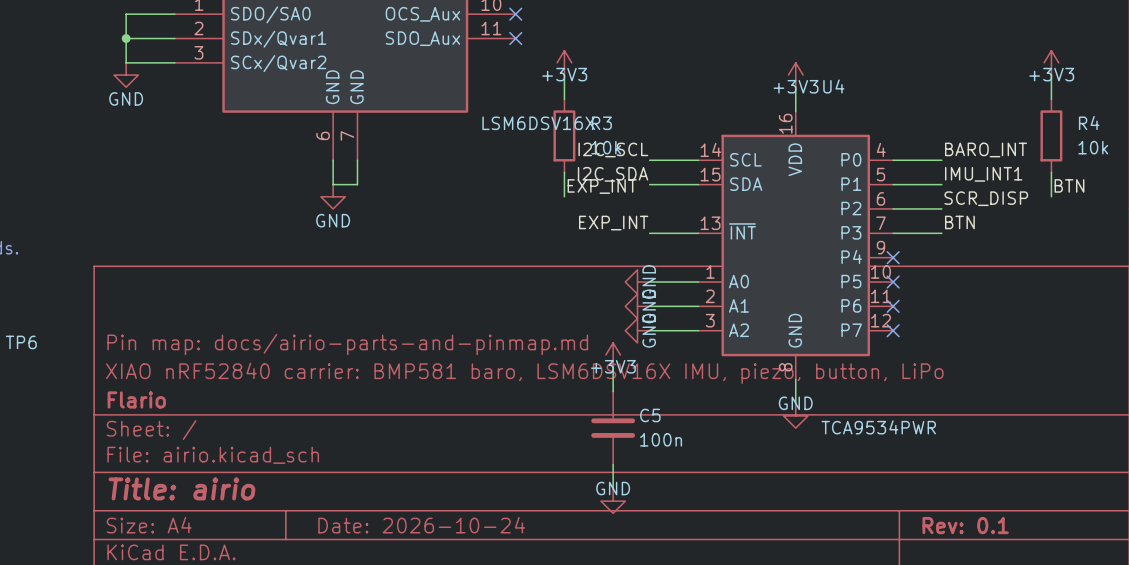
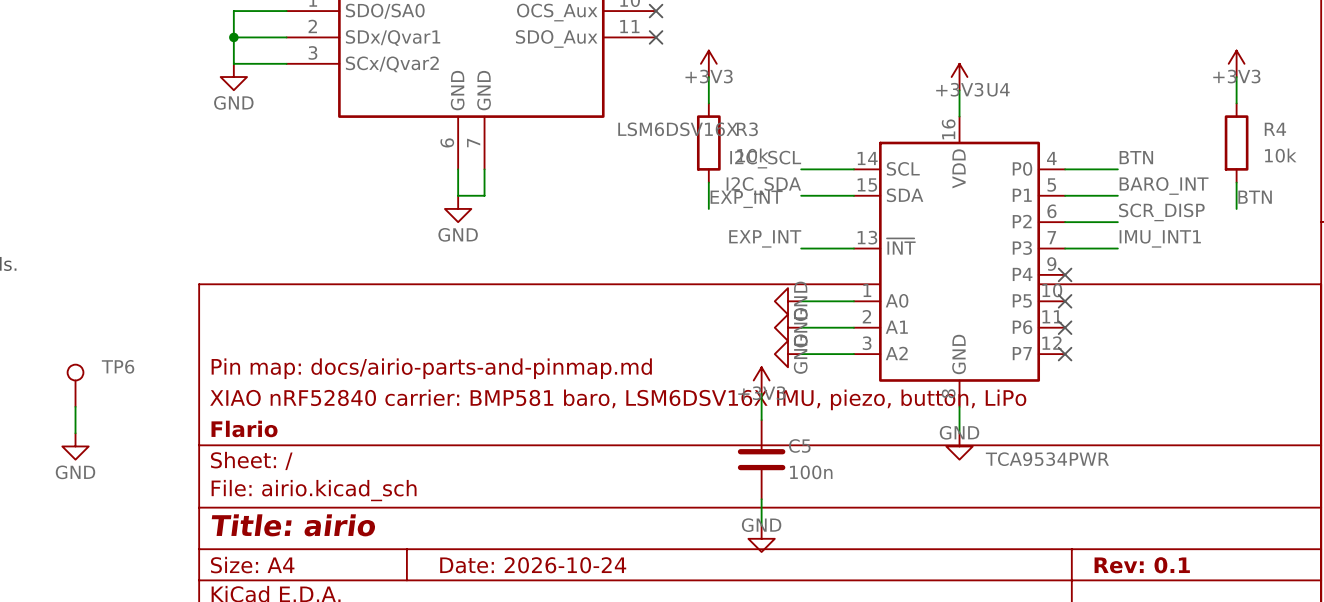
label: BARO_INT (986, 149) -> BTN (1136, 157)
label: IMU_INT1 (983, 174) -> BARO_INT (1164, 186)
label: BTN (959, 222) -> IMU_INT1 (1160, 238)

